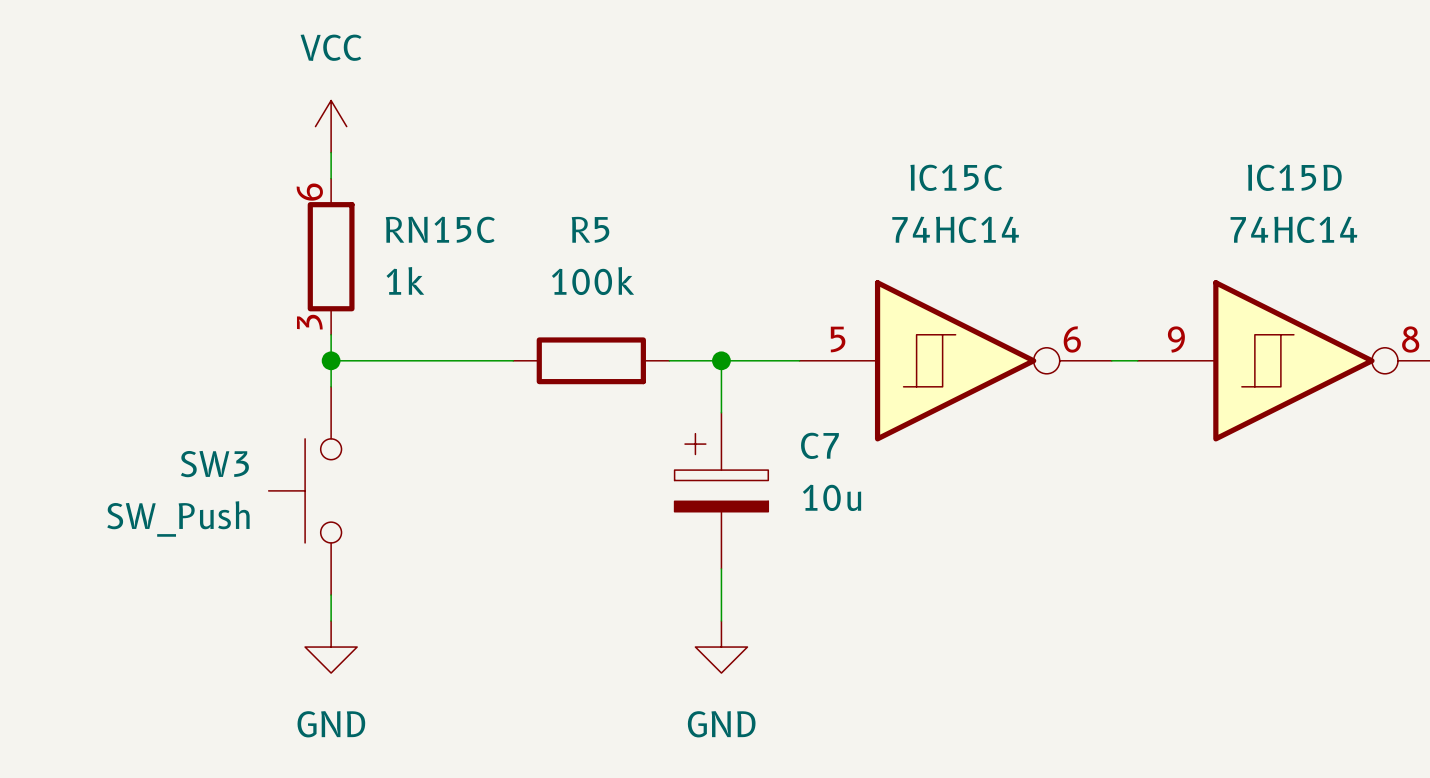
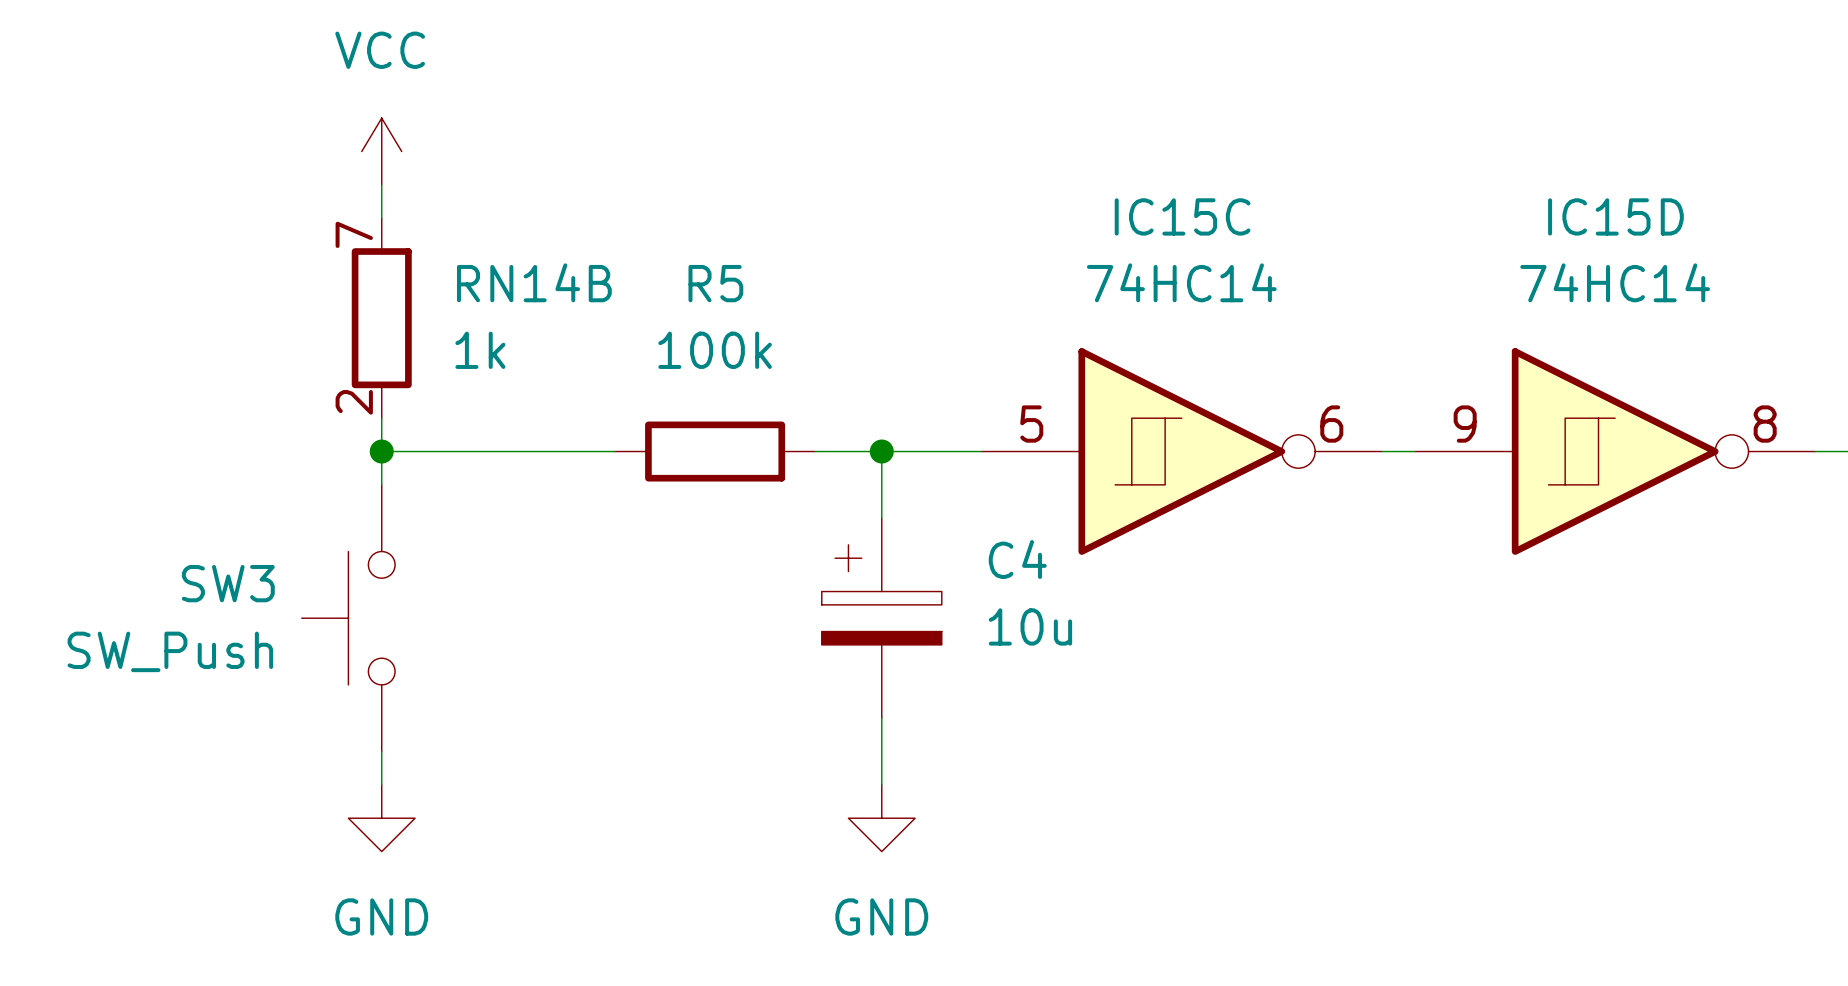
RN15C pin number: 6 (309, 192) -> 7 (354, 234)
RN15C name: RN15C (440, 229) -> RN14B (534, 282)
RN15C pin number: 3 (309, 322) -> 2 (354, 402)
C7 name: C7 (819, 445) -> C4 (1017, 559)

